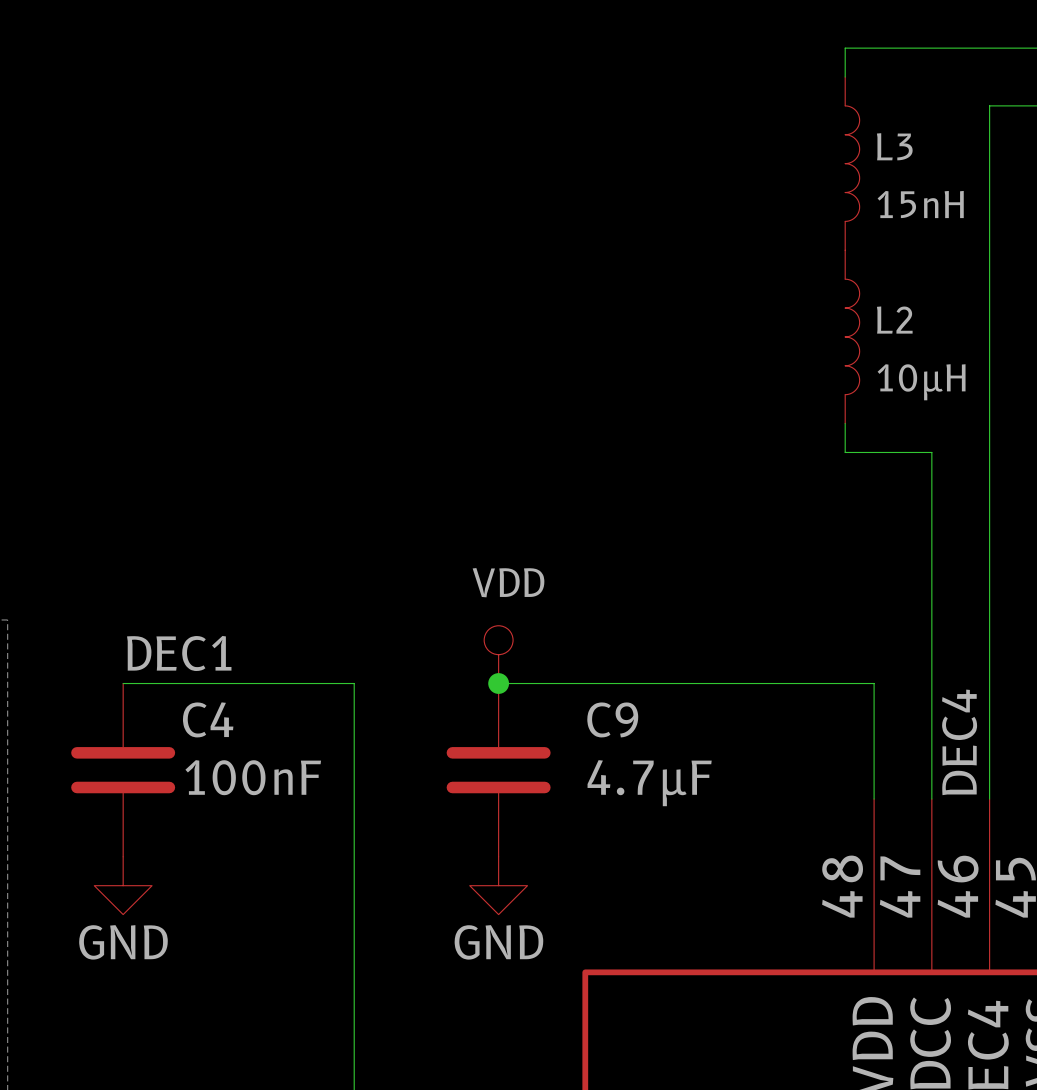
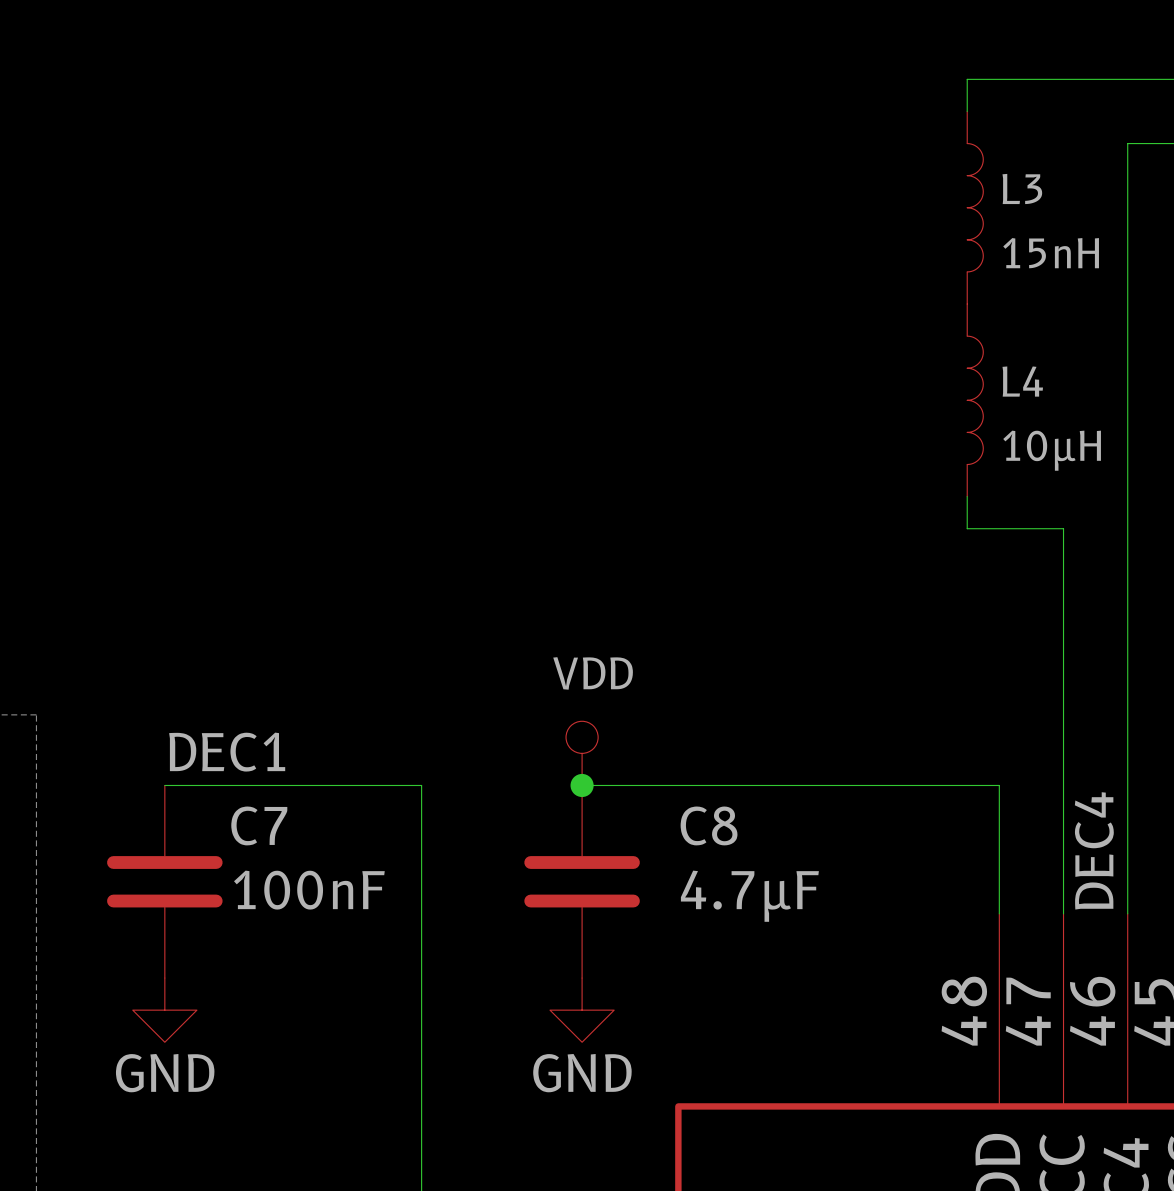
L2 name: L2 (894, 320) -> L4 (1022, 381)
C4 name: C4 (208, 719) -> C7 (259, 825)
C9 name: C9 (612, 719) -> C8 (709, 825)

